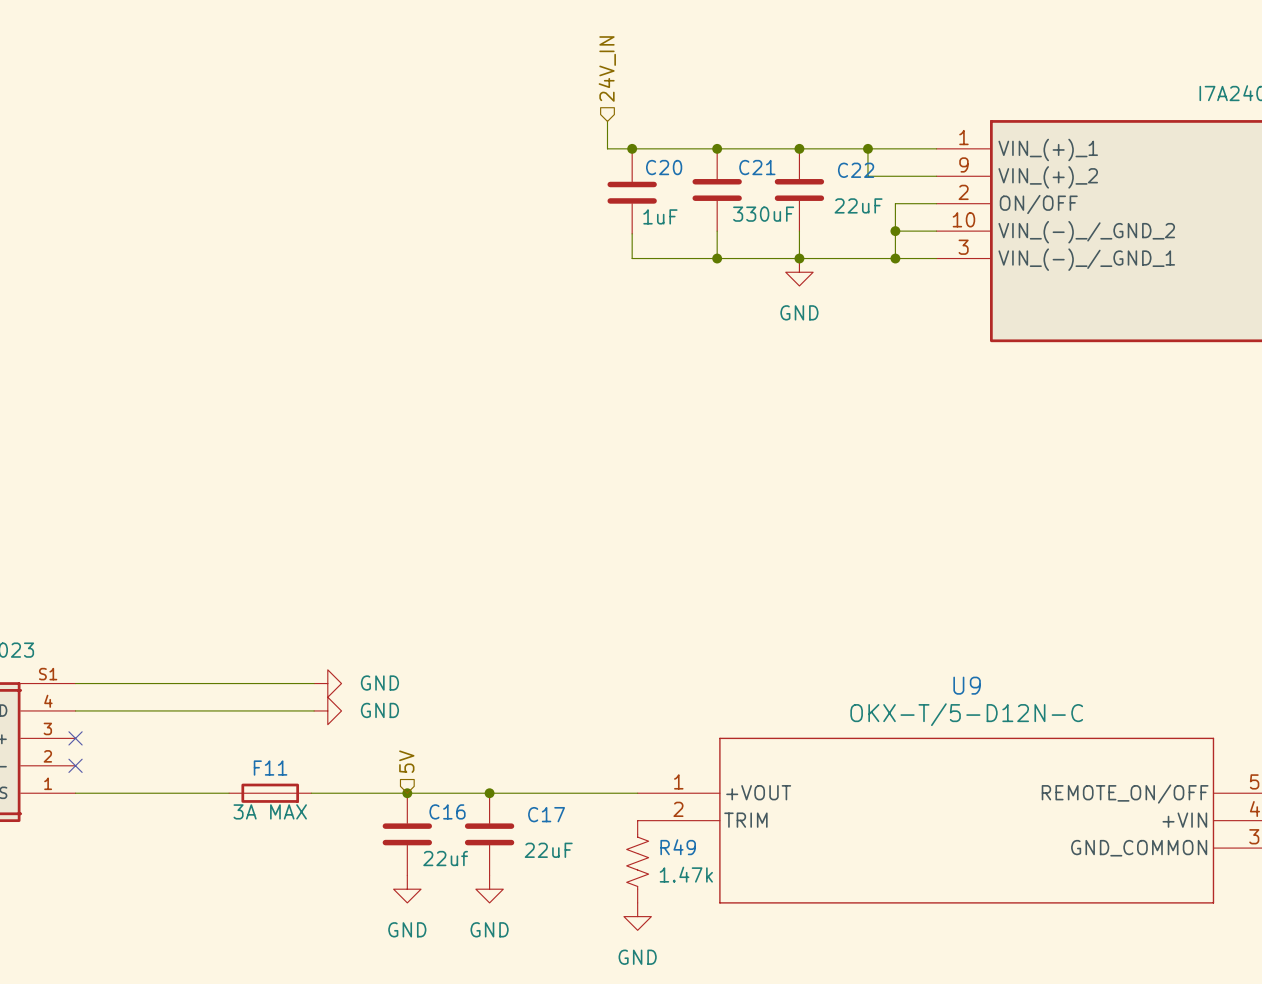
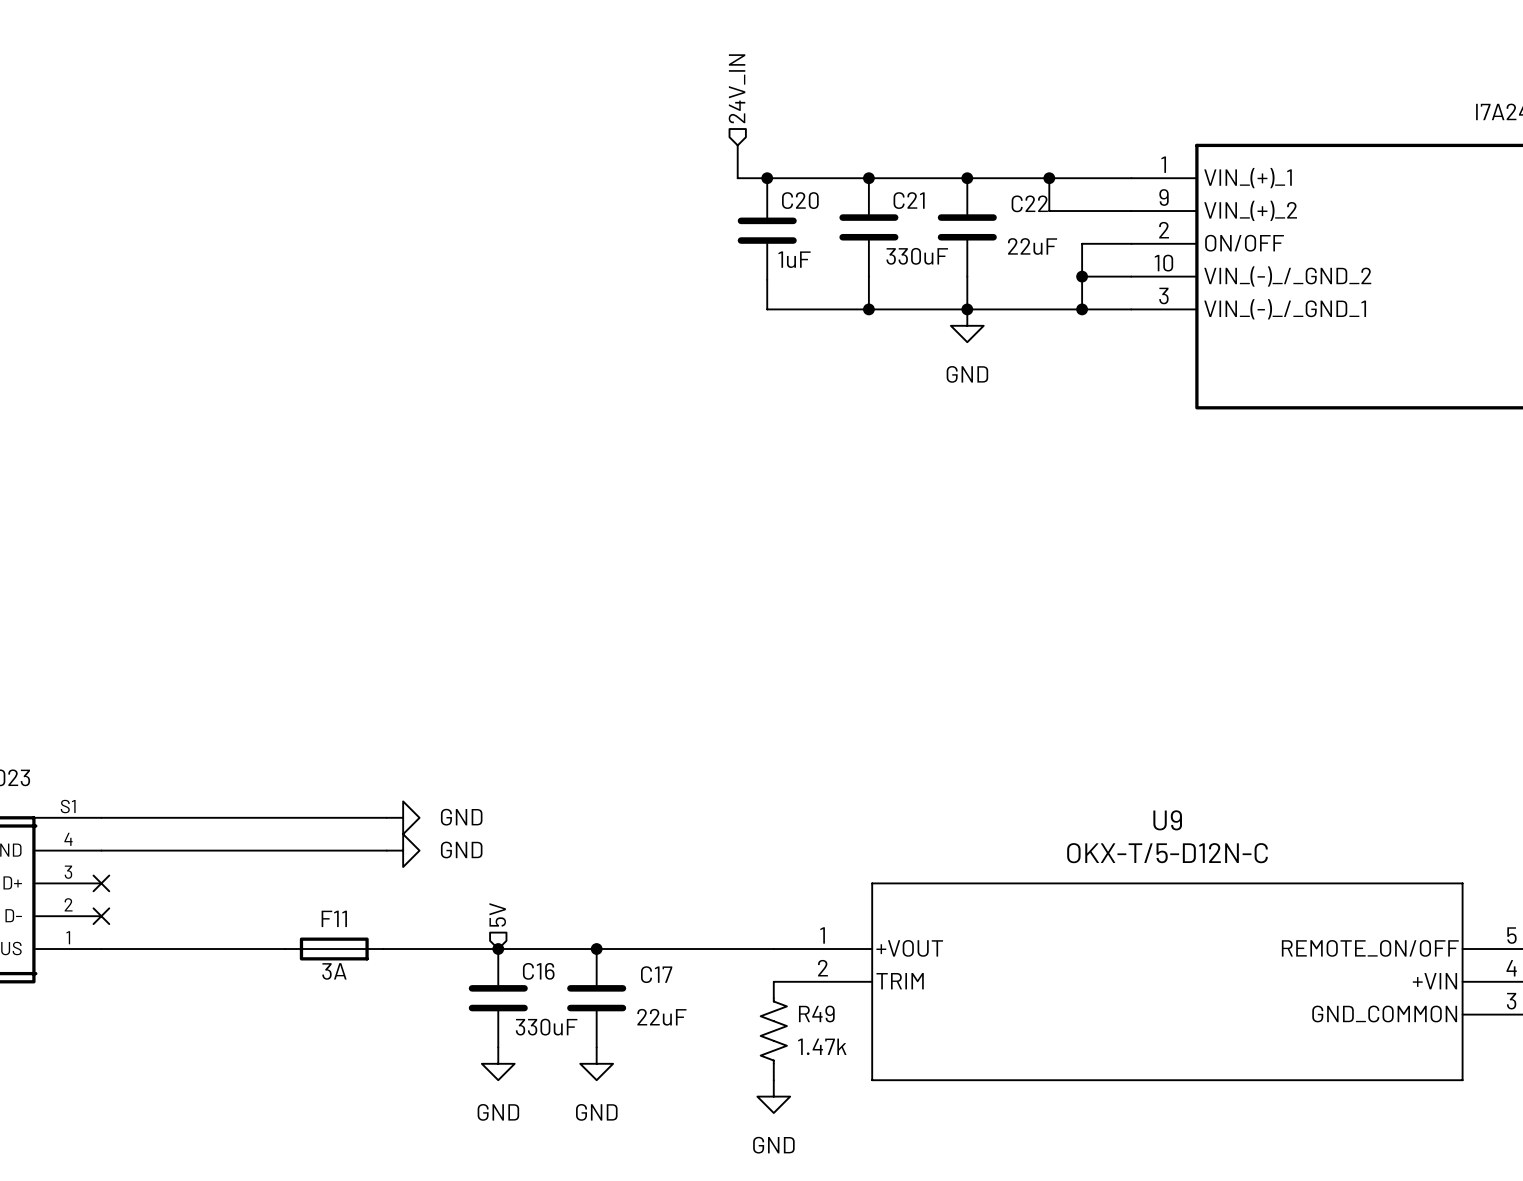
F11 value: 3A MAX (270, 811) -> 3A (334, 971)
C16 value: 22uf (445, 858) -> 330uF (546, 1027)

